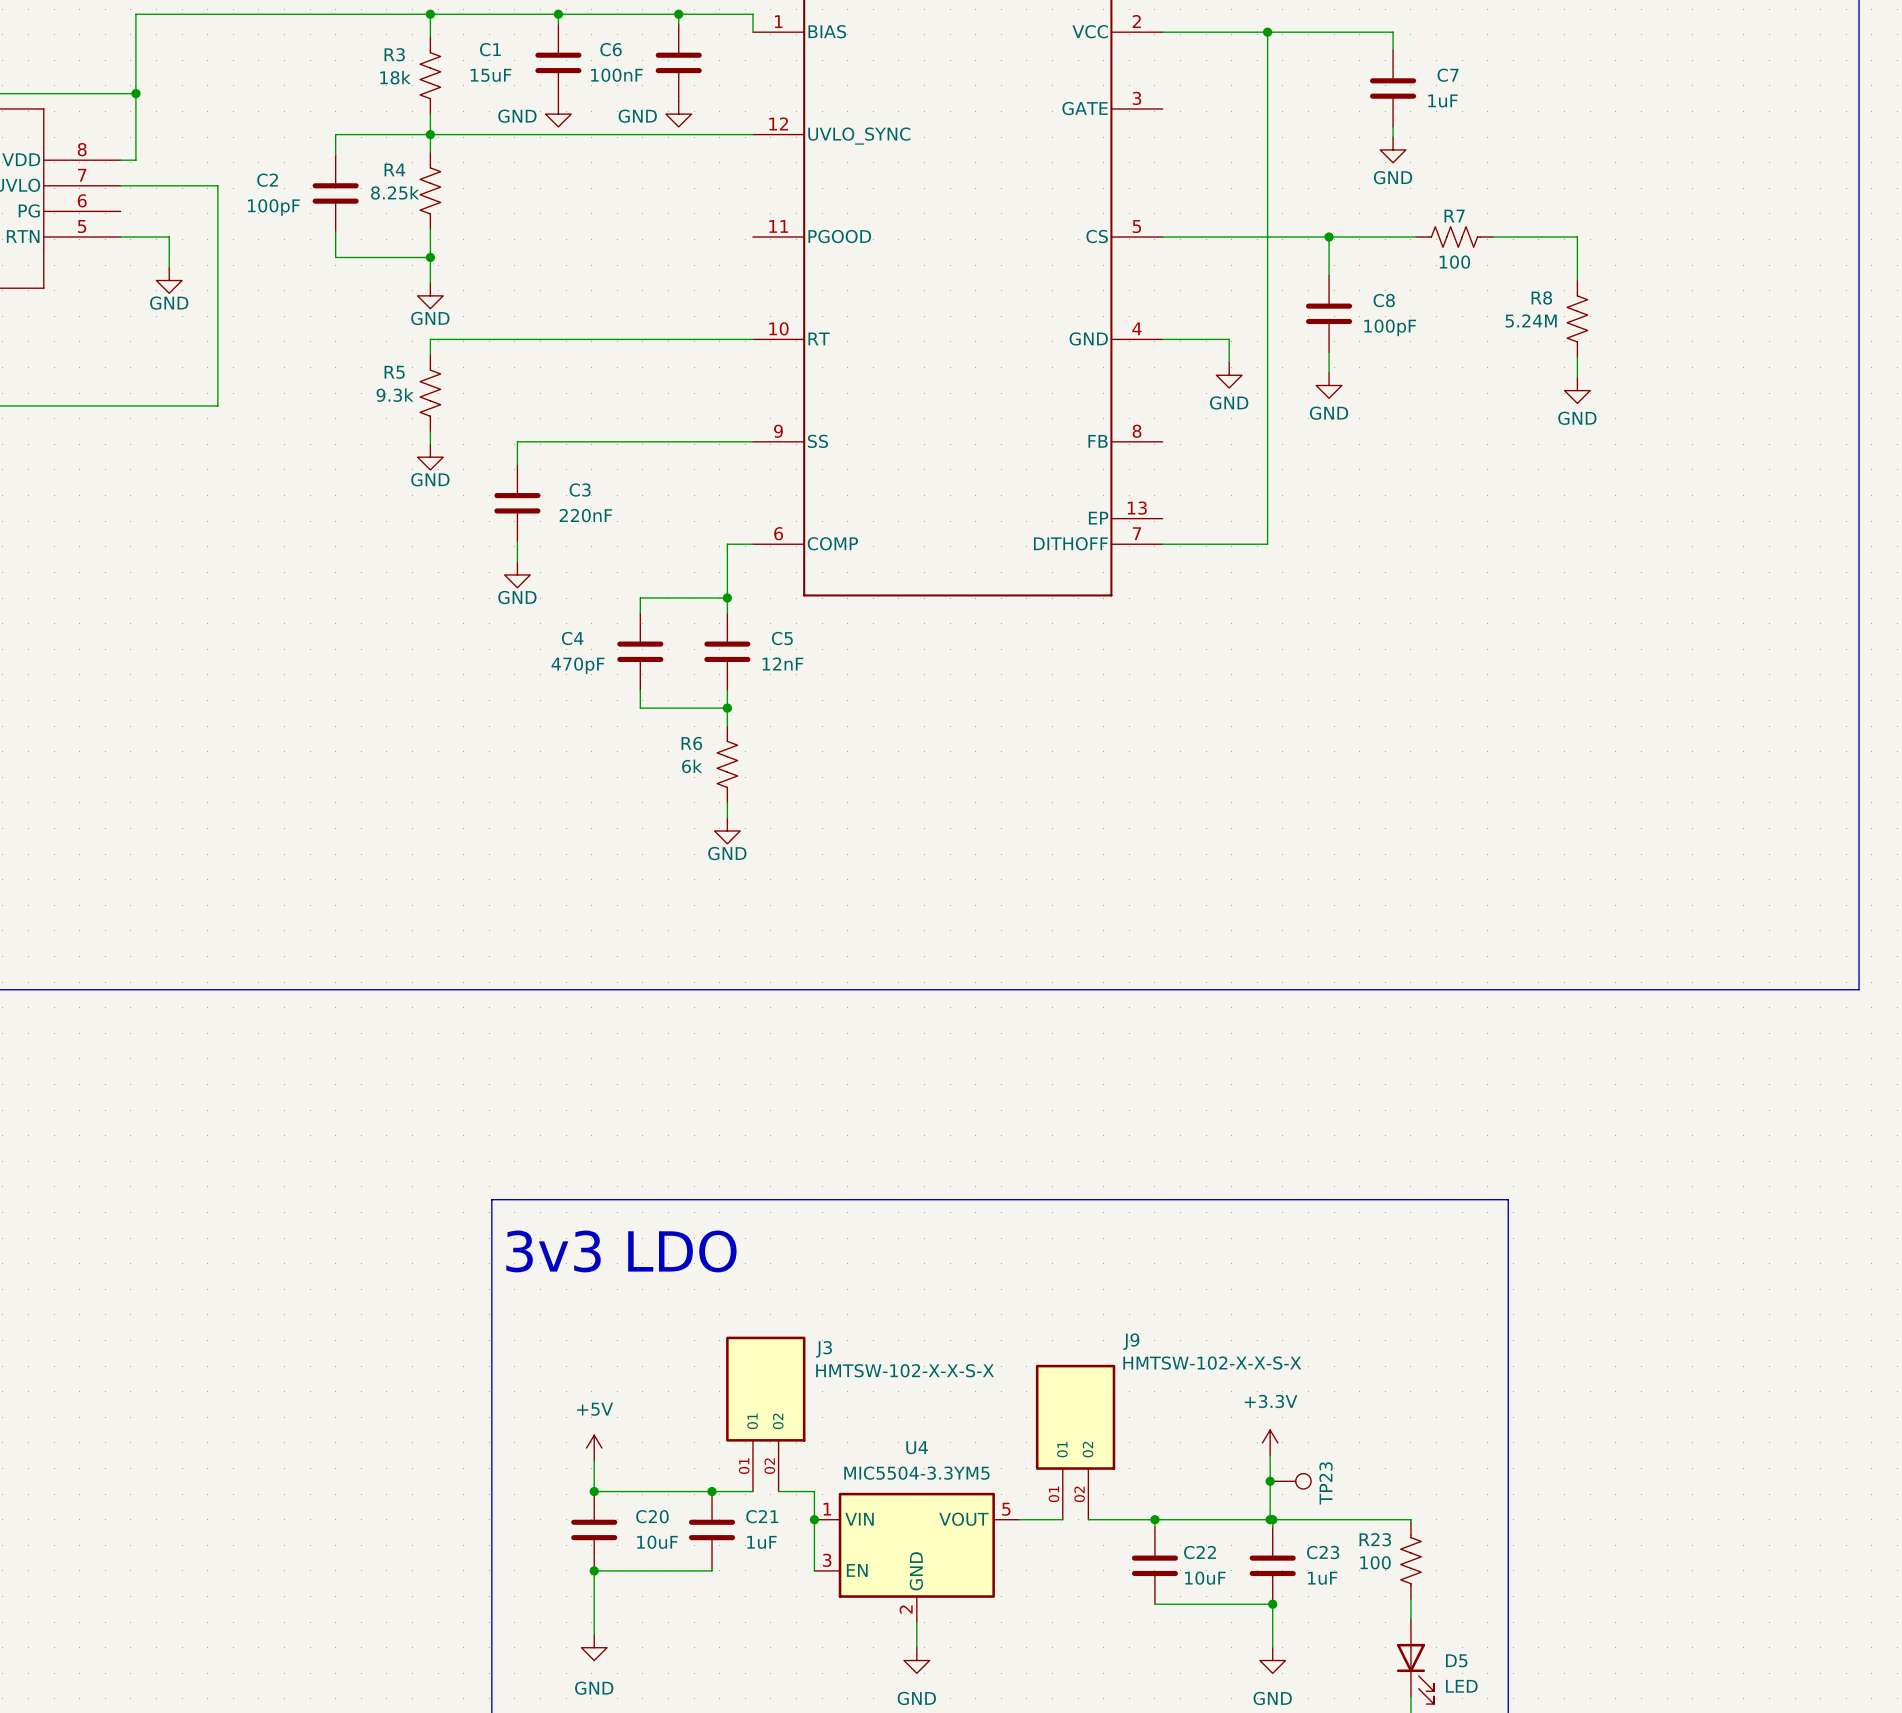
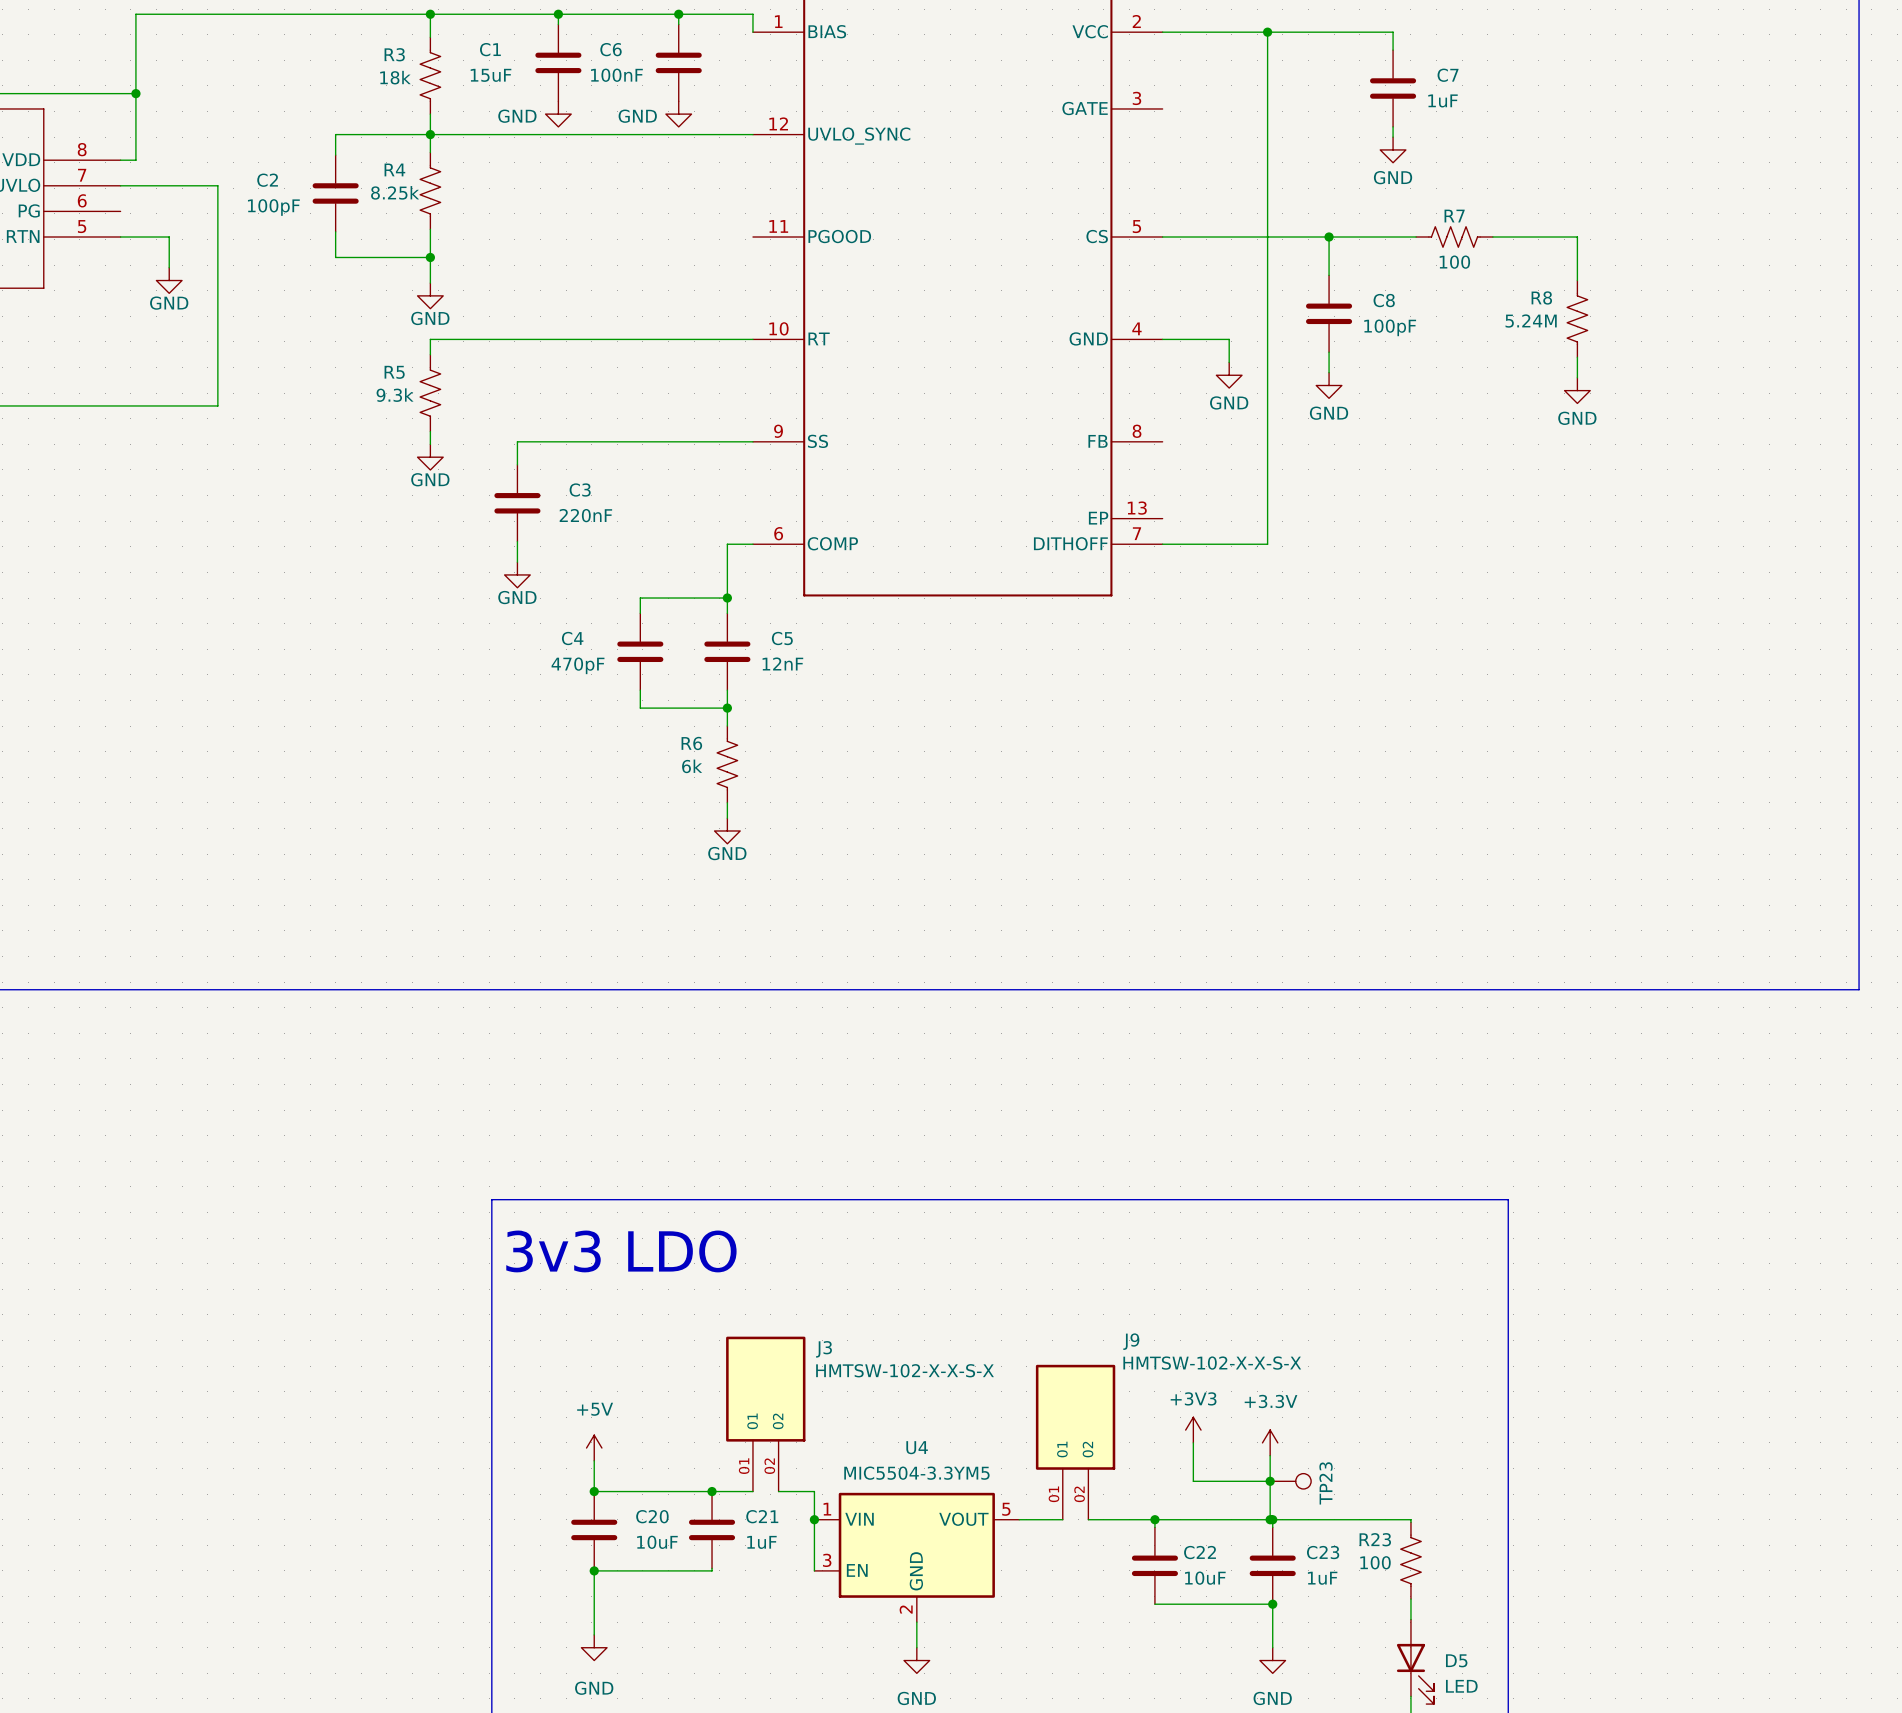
power symbol: none -> +3V3 (1193, 1430)
wire: none -> (1193, 1442) (1193, 1481) (1270, 1481)

